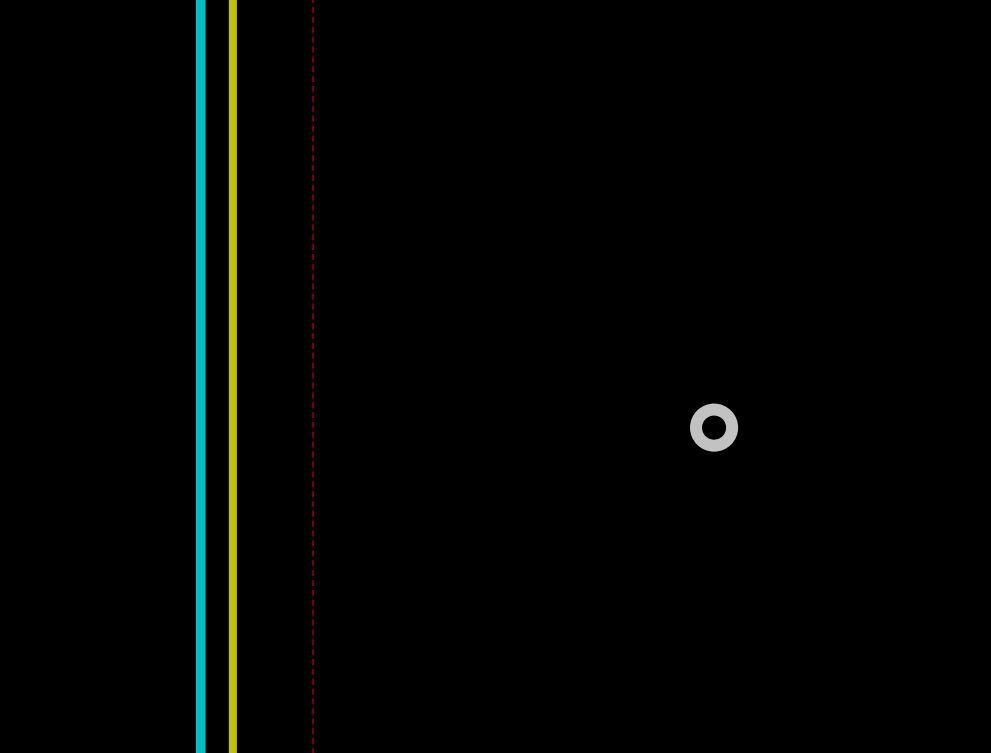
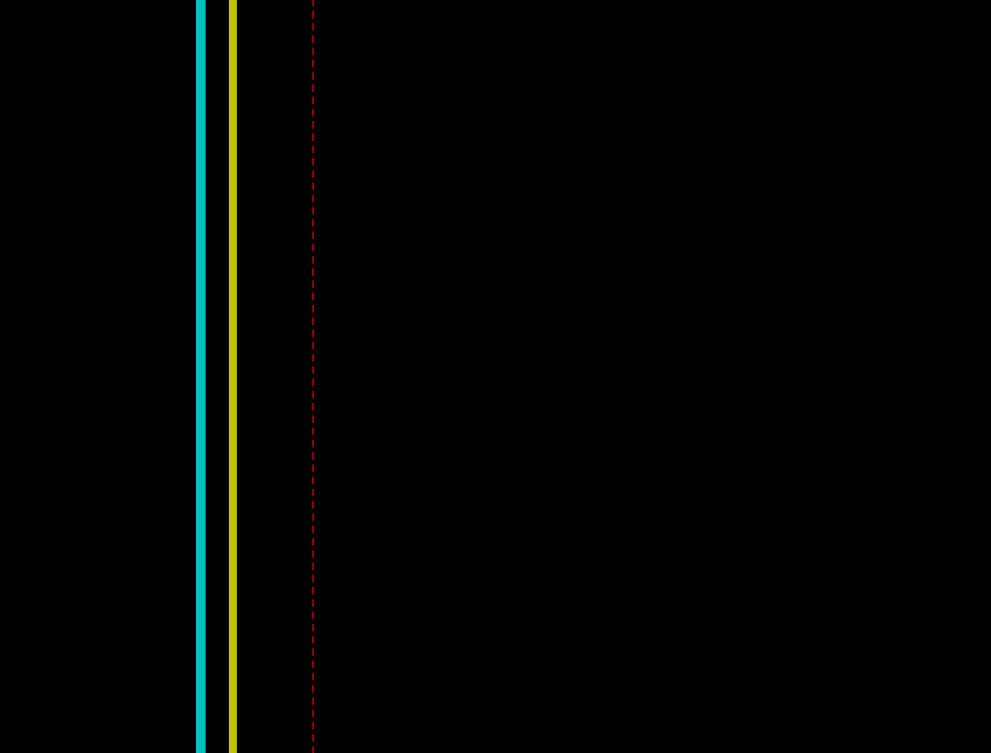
via: (714, 427) -> none

